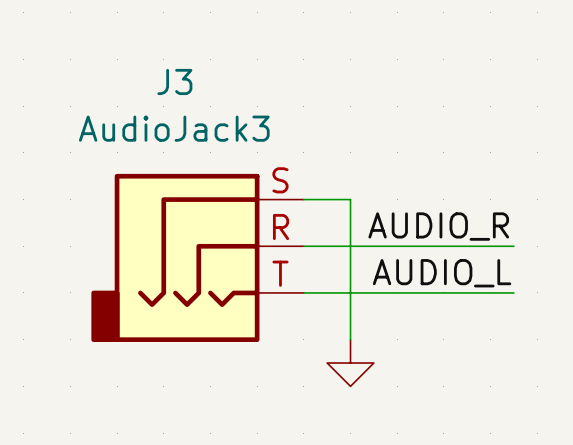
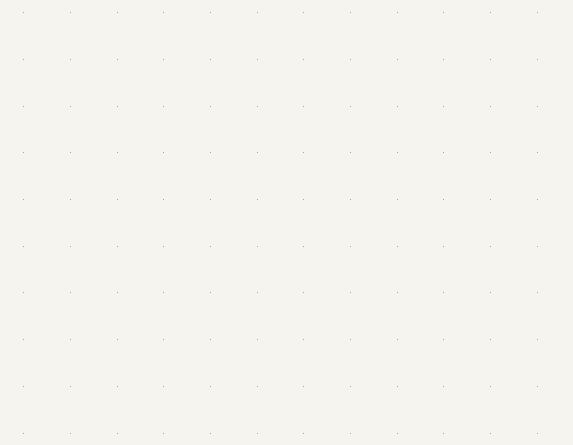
wire: (303, 199) (350, 199) (350, 339) -> none
label: AUDIO_R (438, 226) -> none
wire: (303, 246) (513, 246) -> none
J3: AudioJack3 (197, 257) -> none
label: AUDIO_L (442, 273) -> none
wire: (303, 292) (513, 292) -> none
power symbol: (350, 363) -> none

